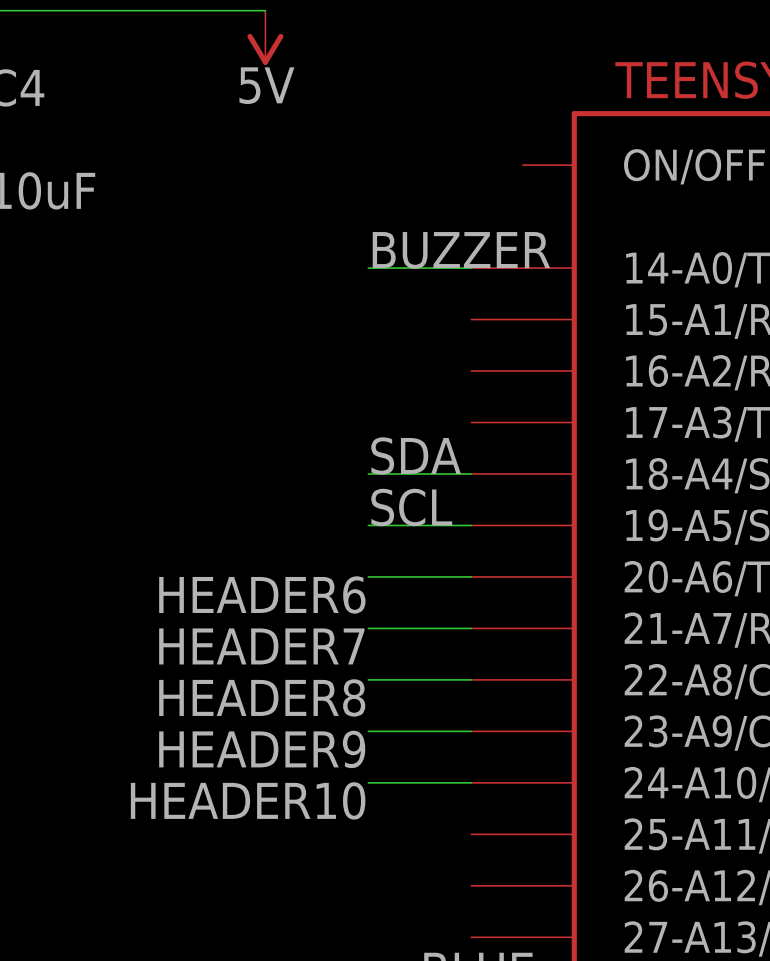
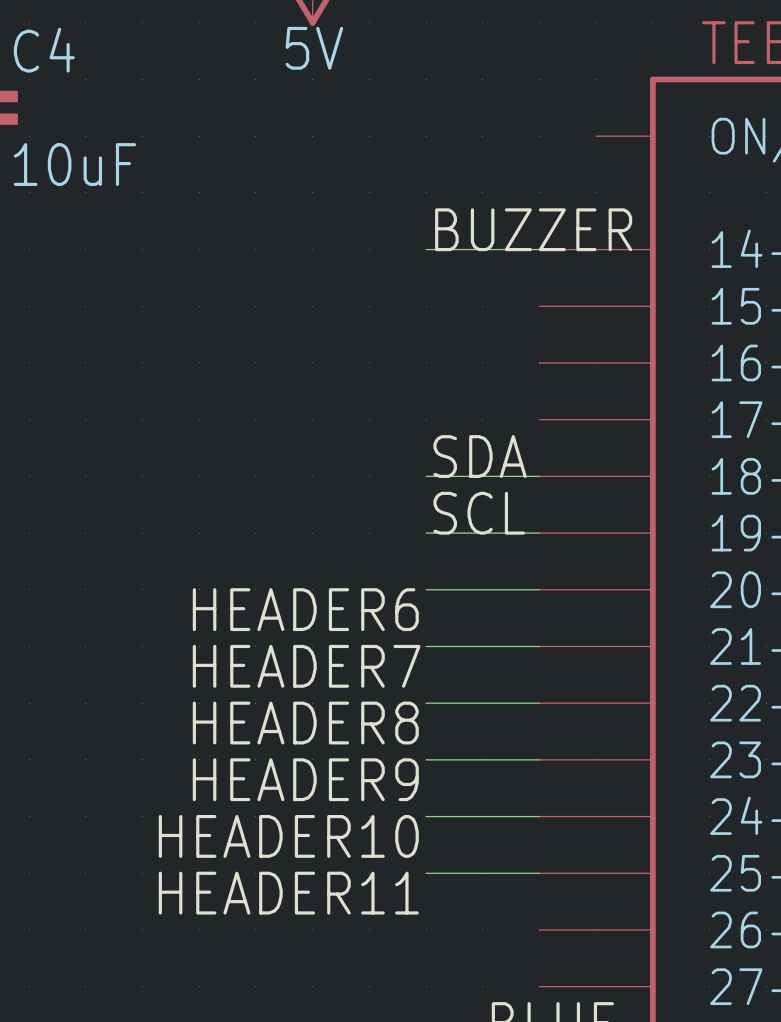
wire: none -> (426, 873) (539, 873)
label: none -> HEADER11 (288, 893)

